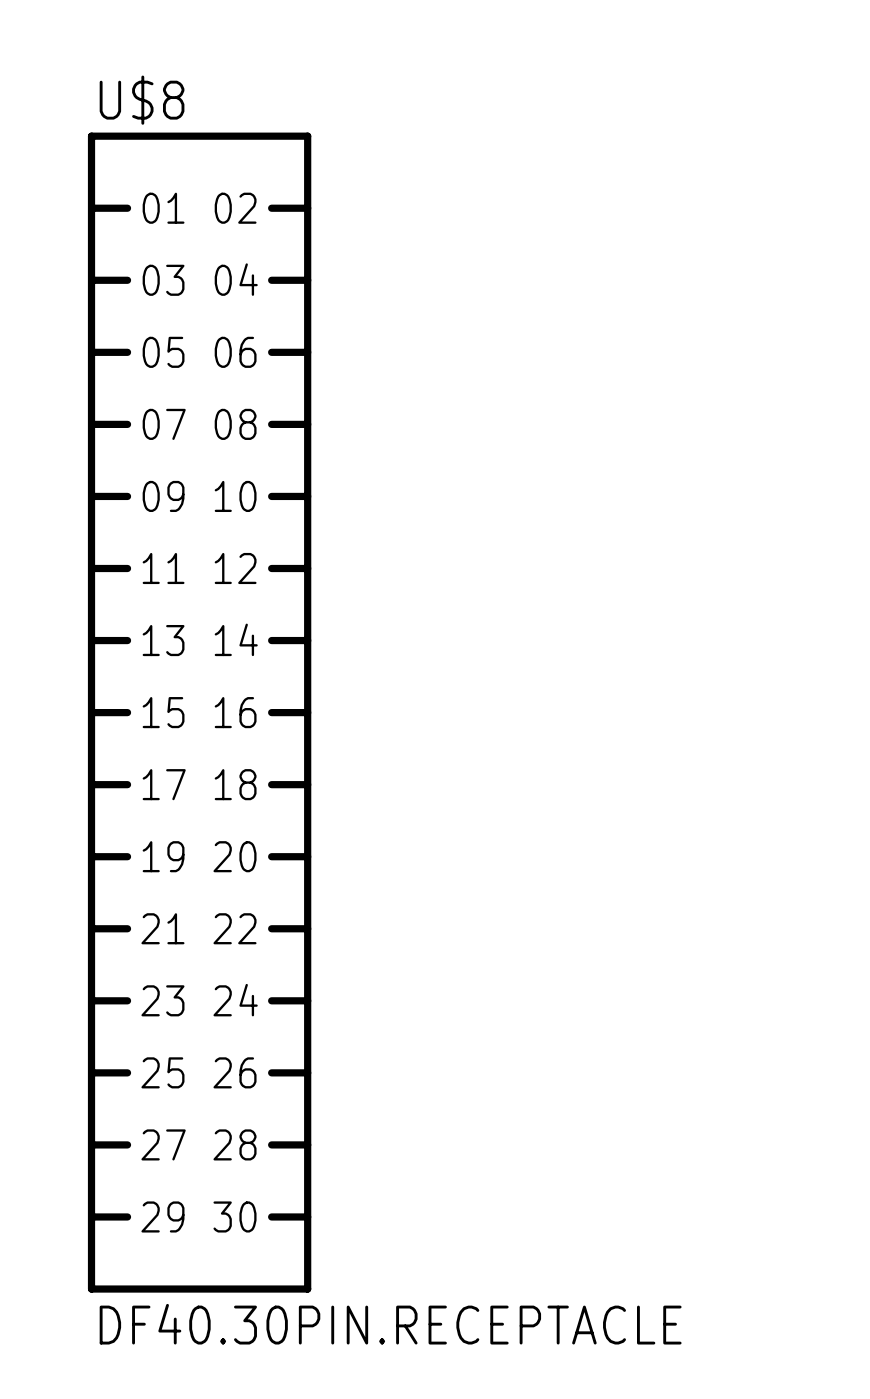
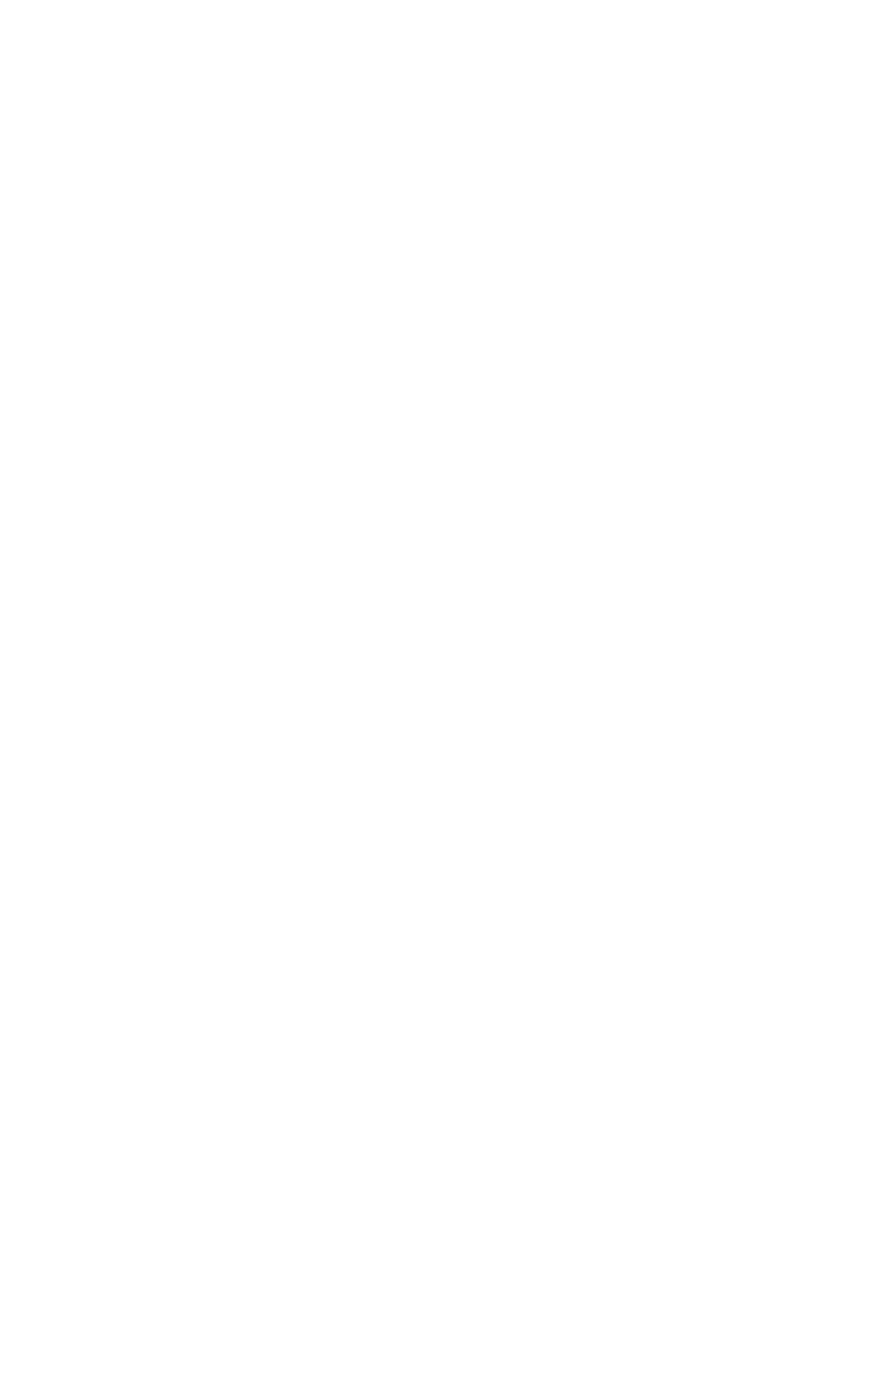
U$8: DF40.30PIN.RECEPTACLE (199, 712) -> none

